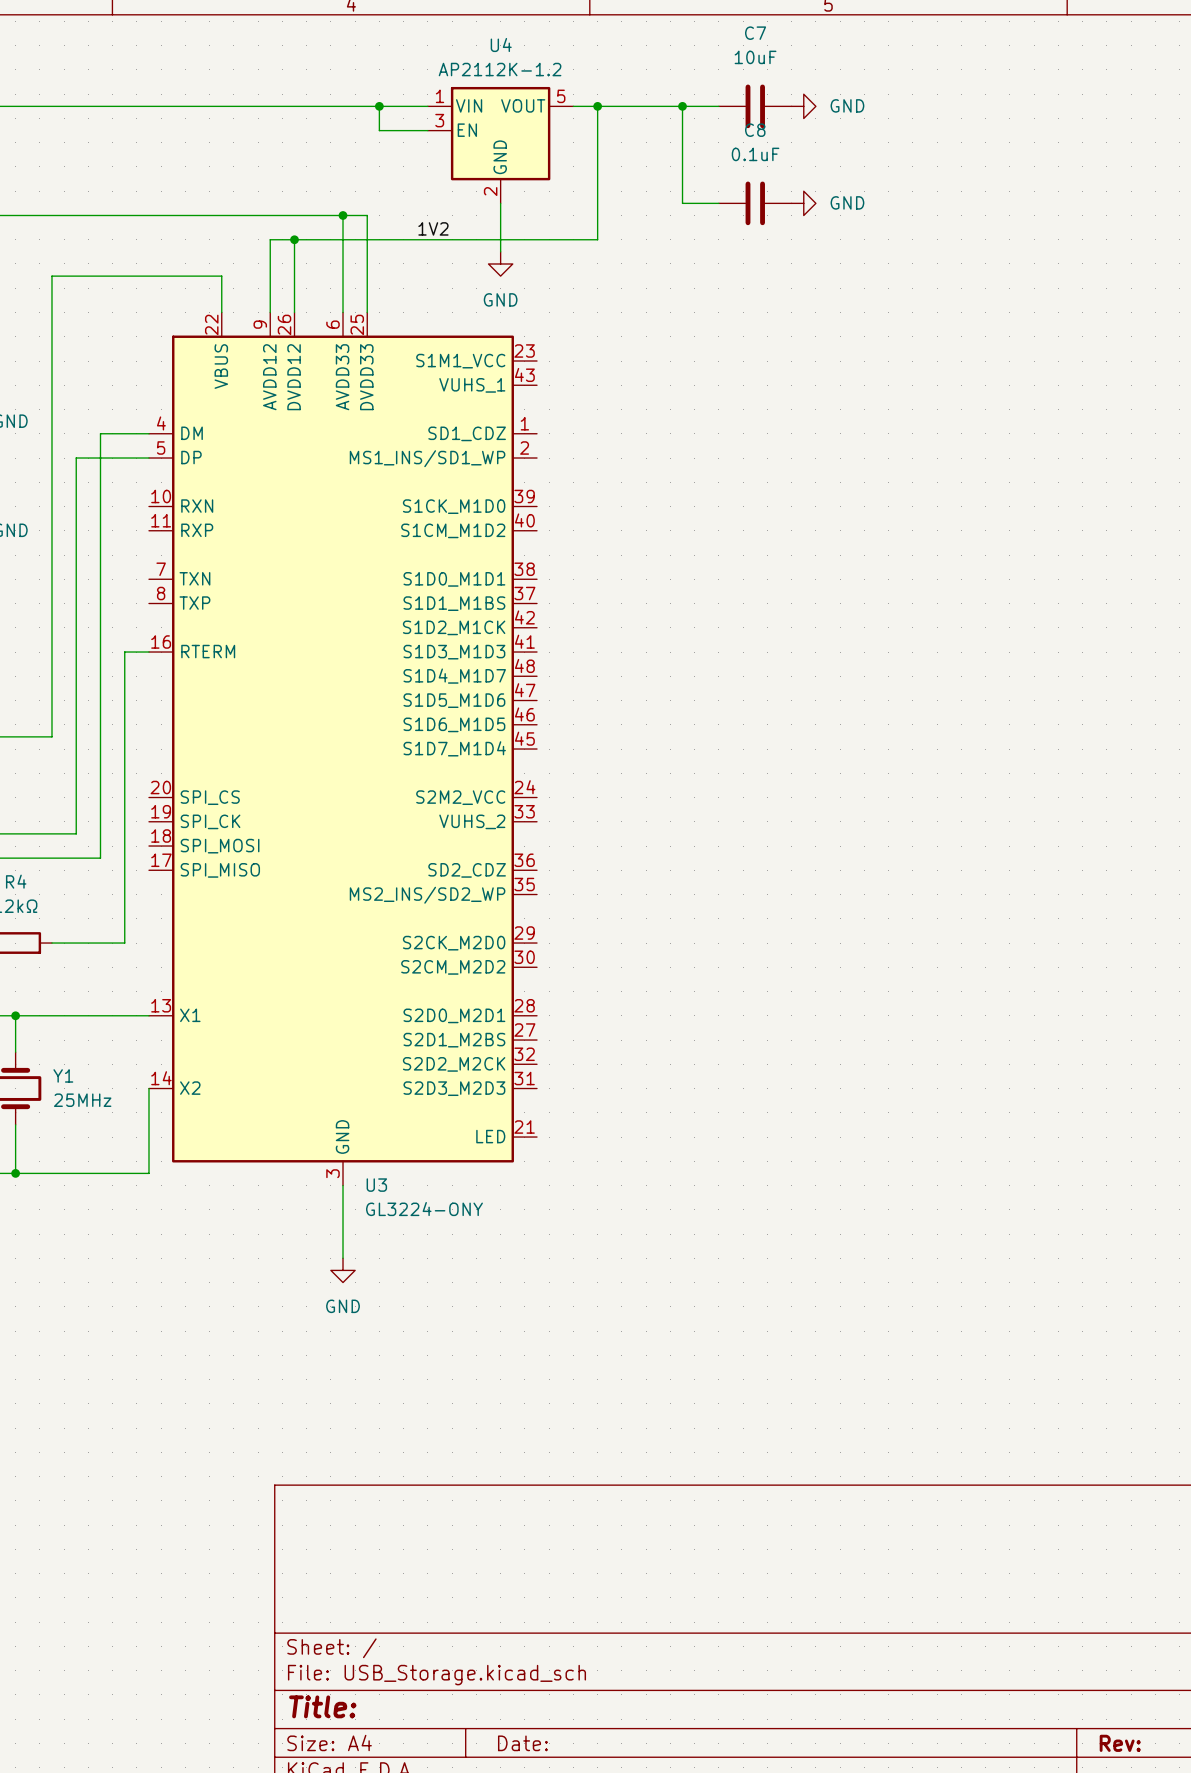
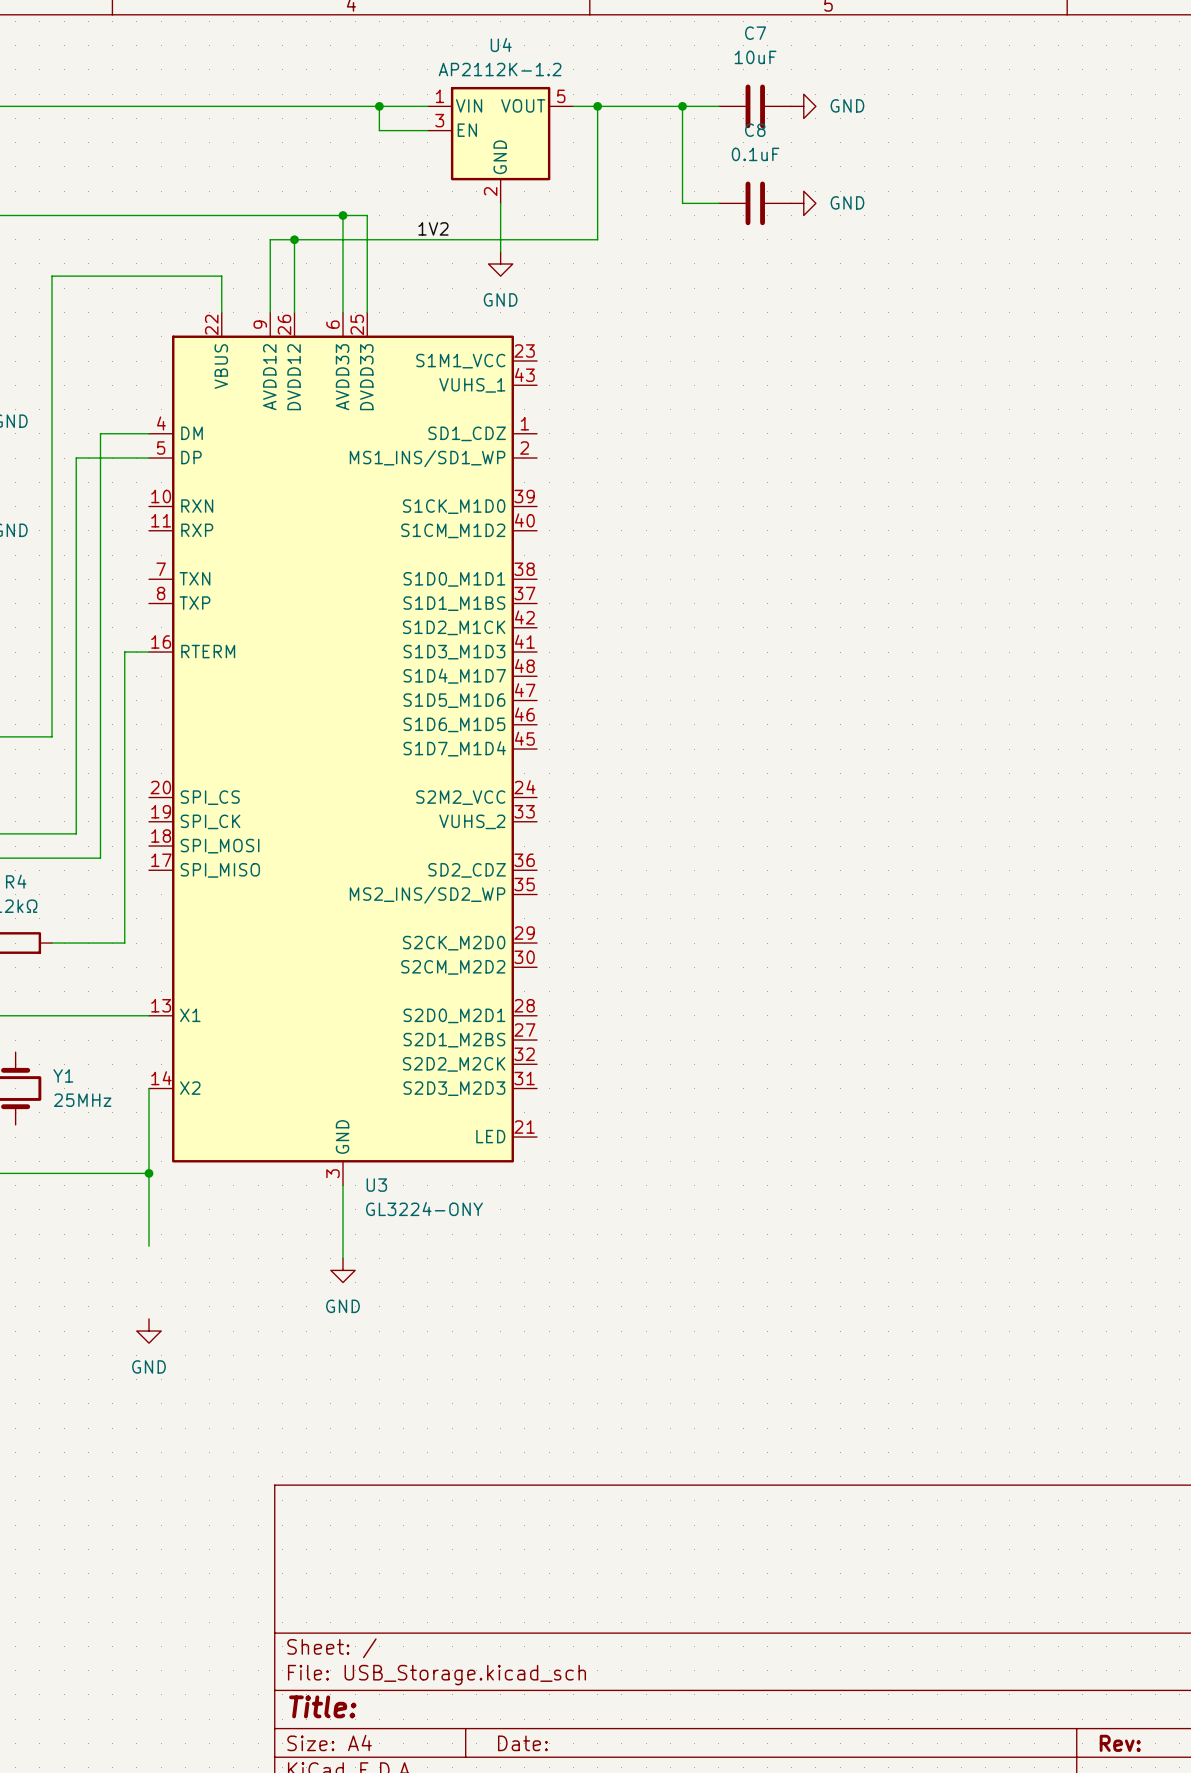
wire: (15, 1015) (15, 1052) -> none
junction: (15, 1015) -> none
wire: (15, 1124) (15, 1173) -> none
junction: (15, 1173) -> none
wire: none -> (148, 1173) (148, 1246)
junction: none -> (148, 1173)
power symbol: none -> GND (148, 1331)

